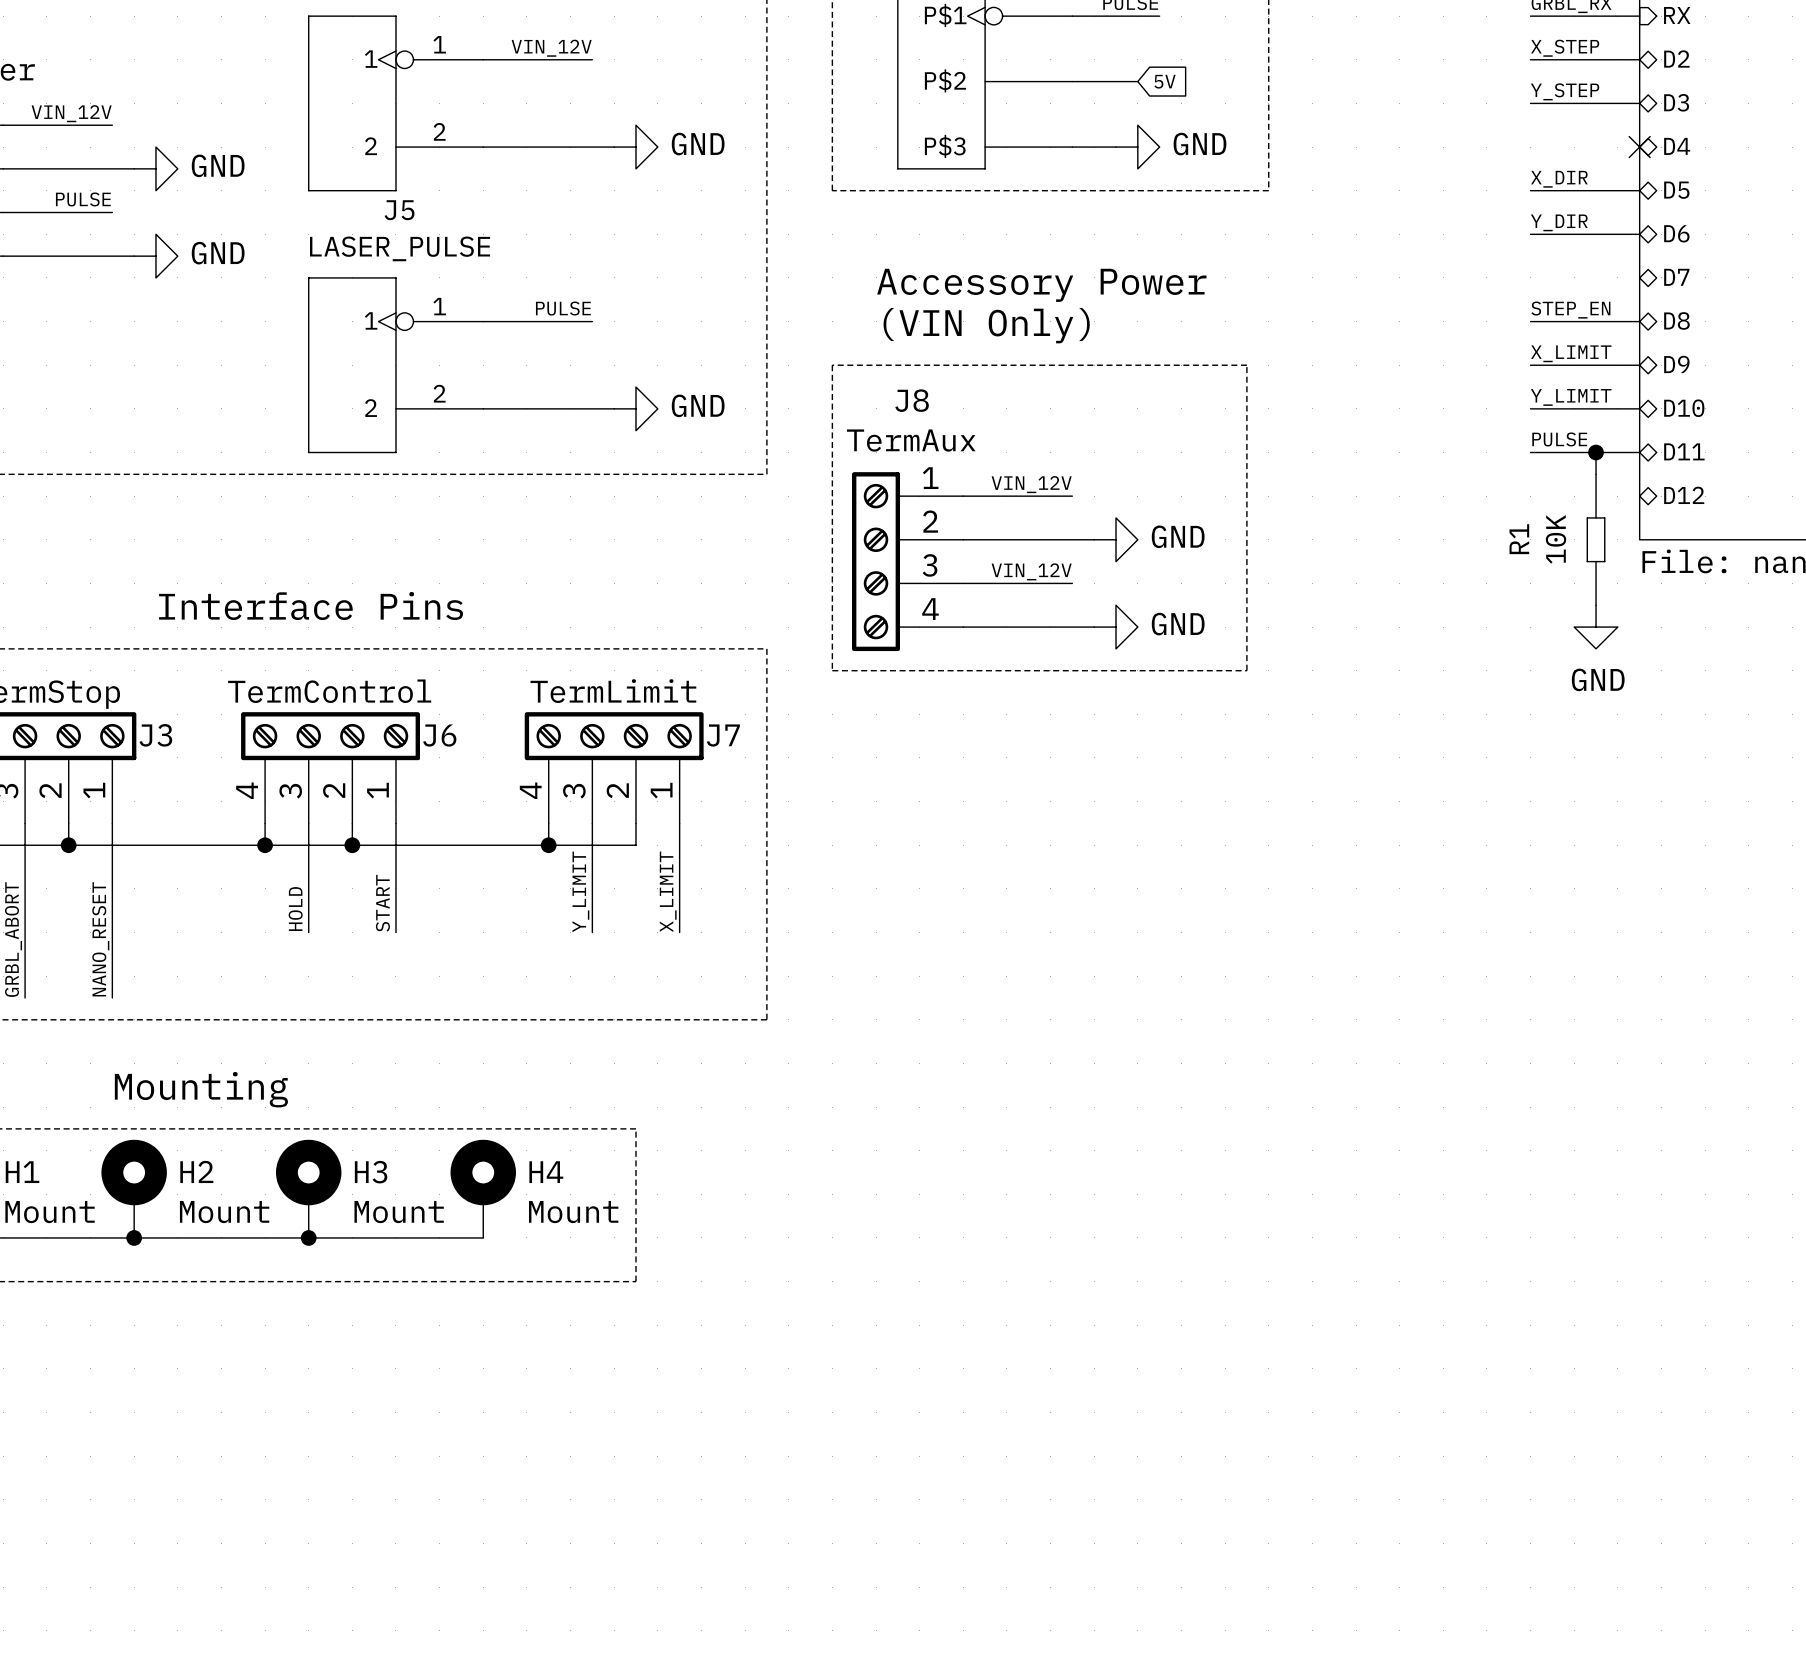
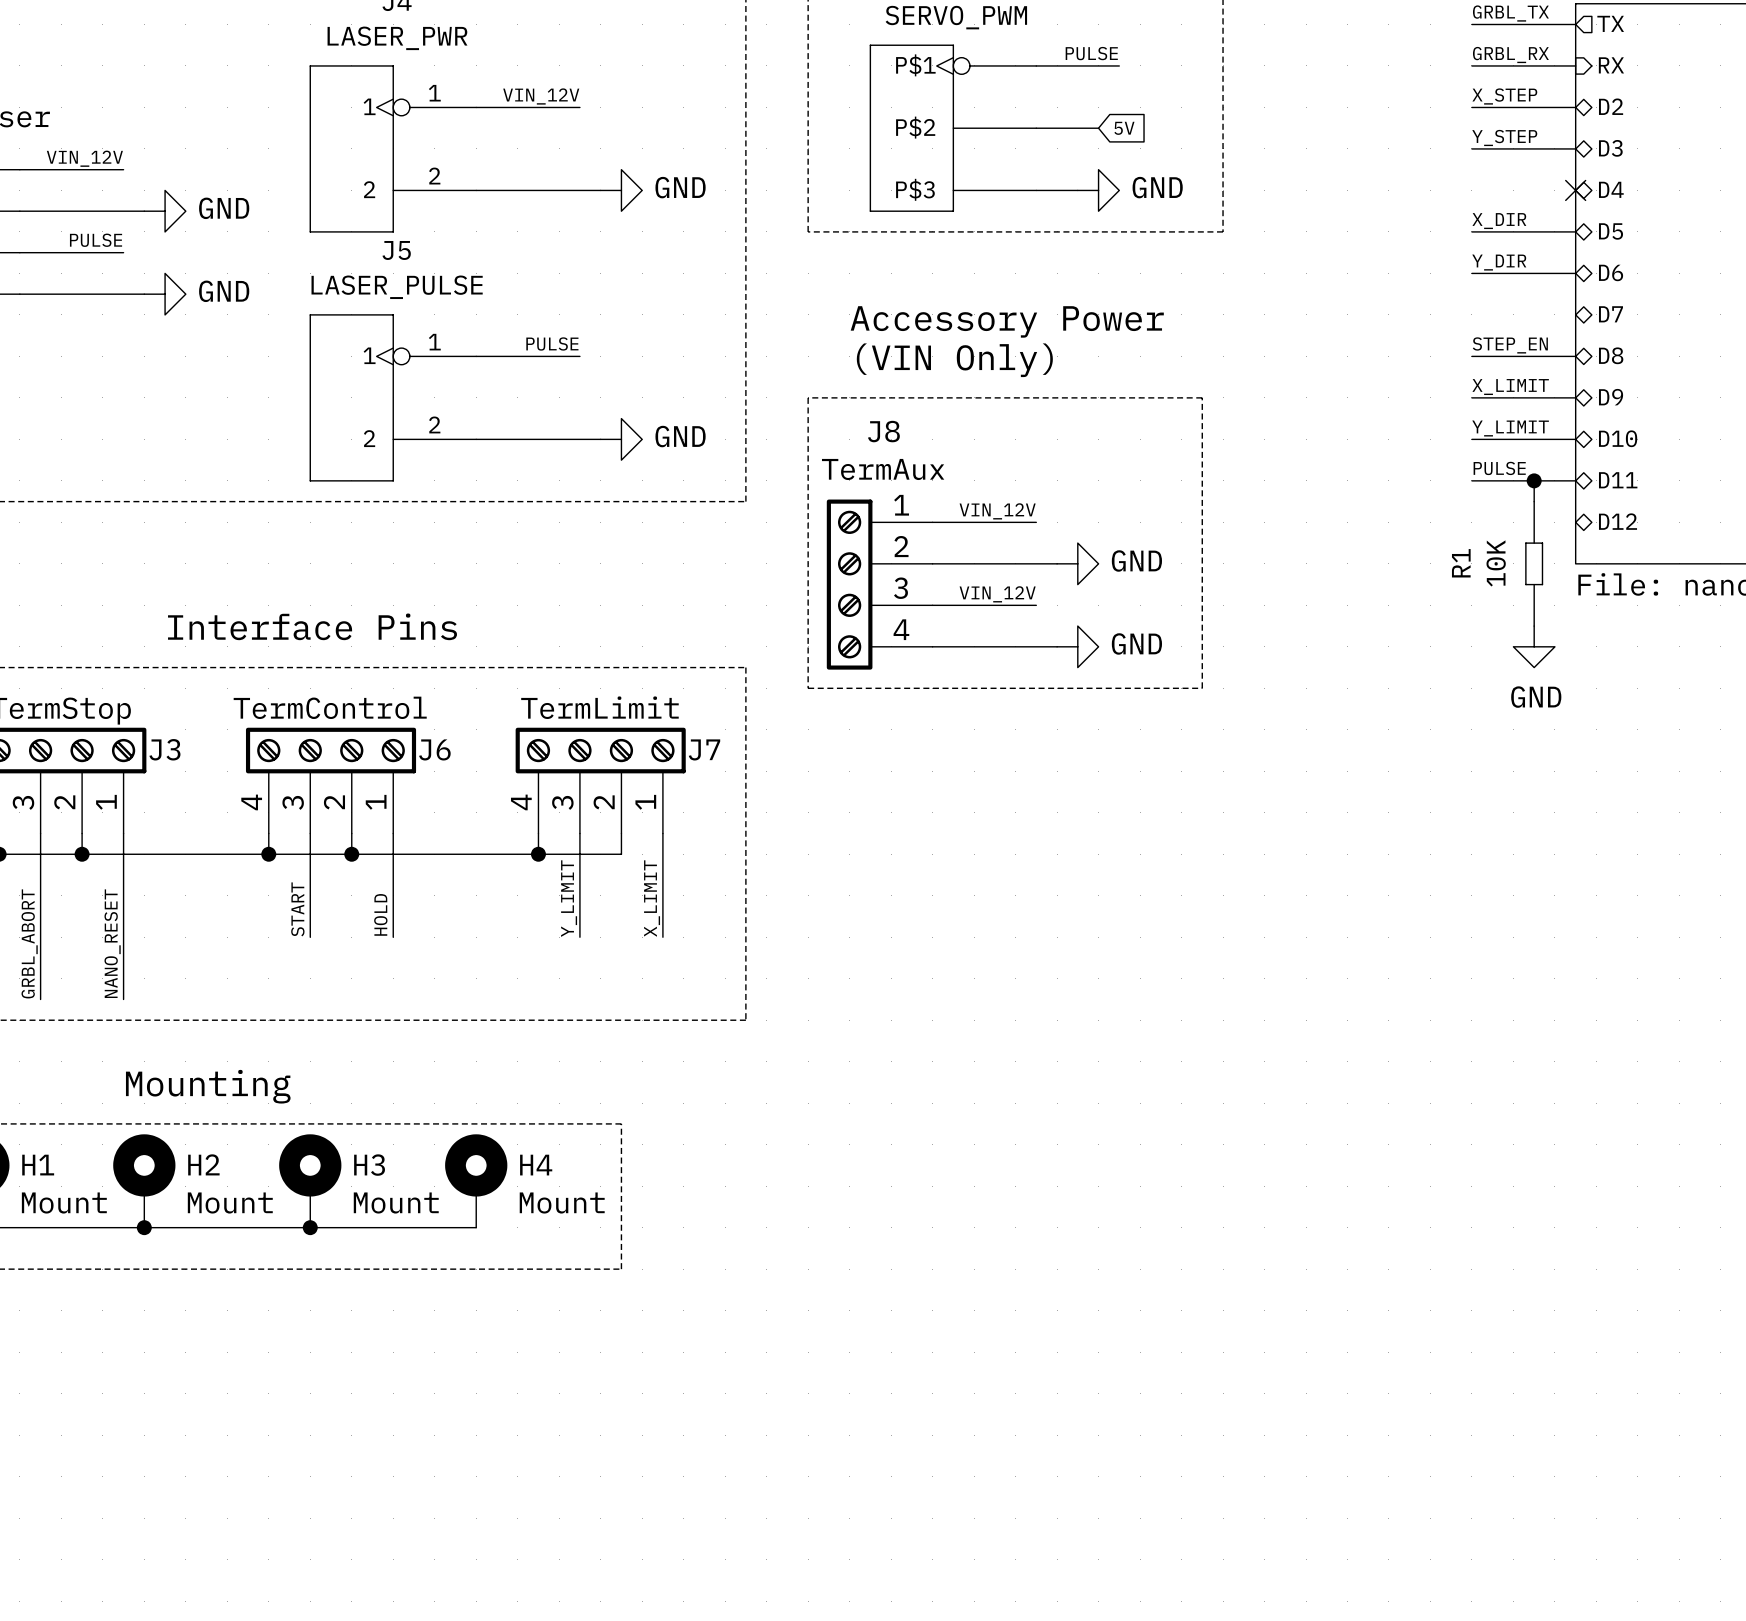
label: START (382, 903) -> HOLD (380, 914)
label: HOLD (295, 909) -> START (297, 909)

